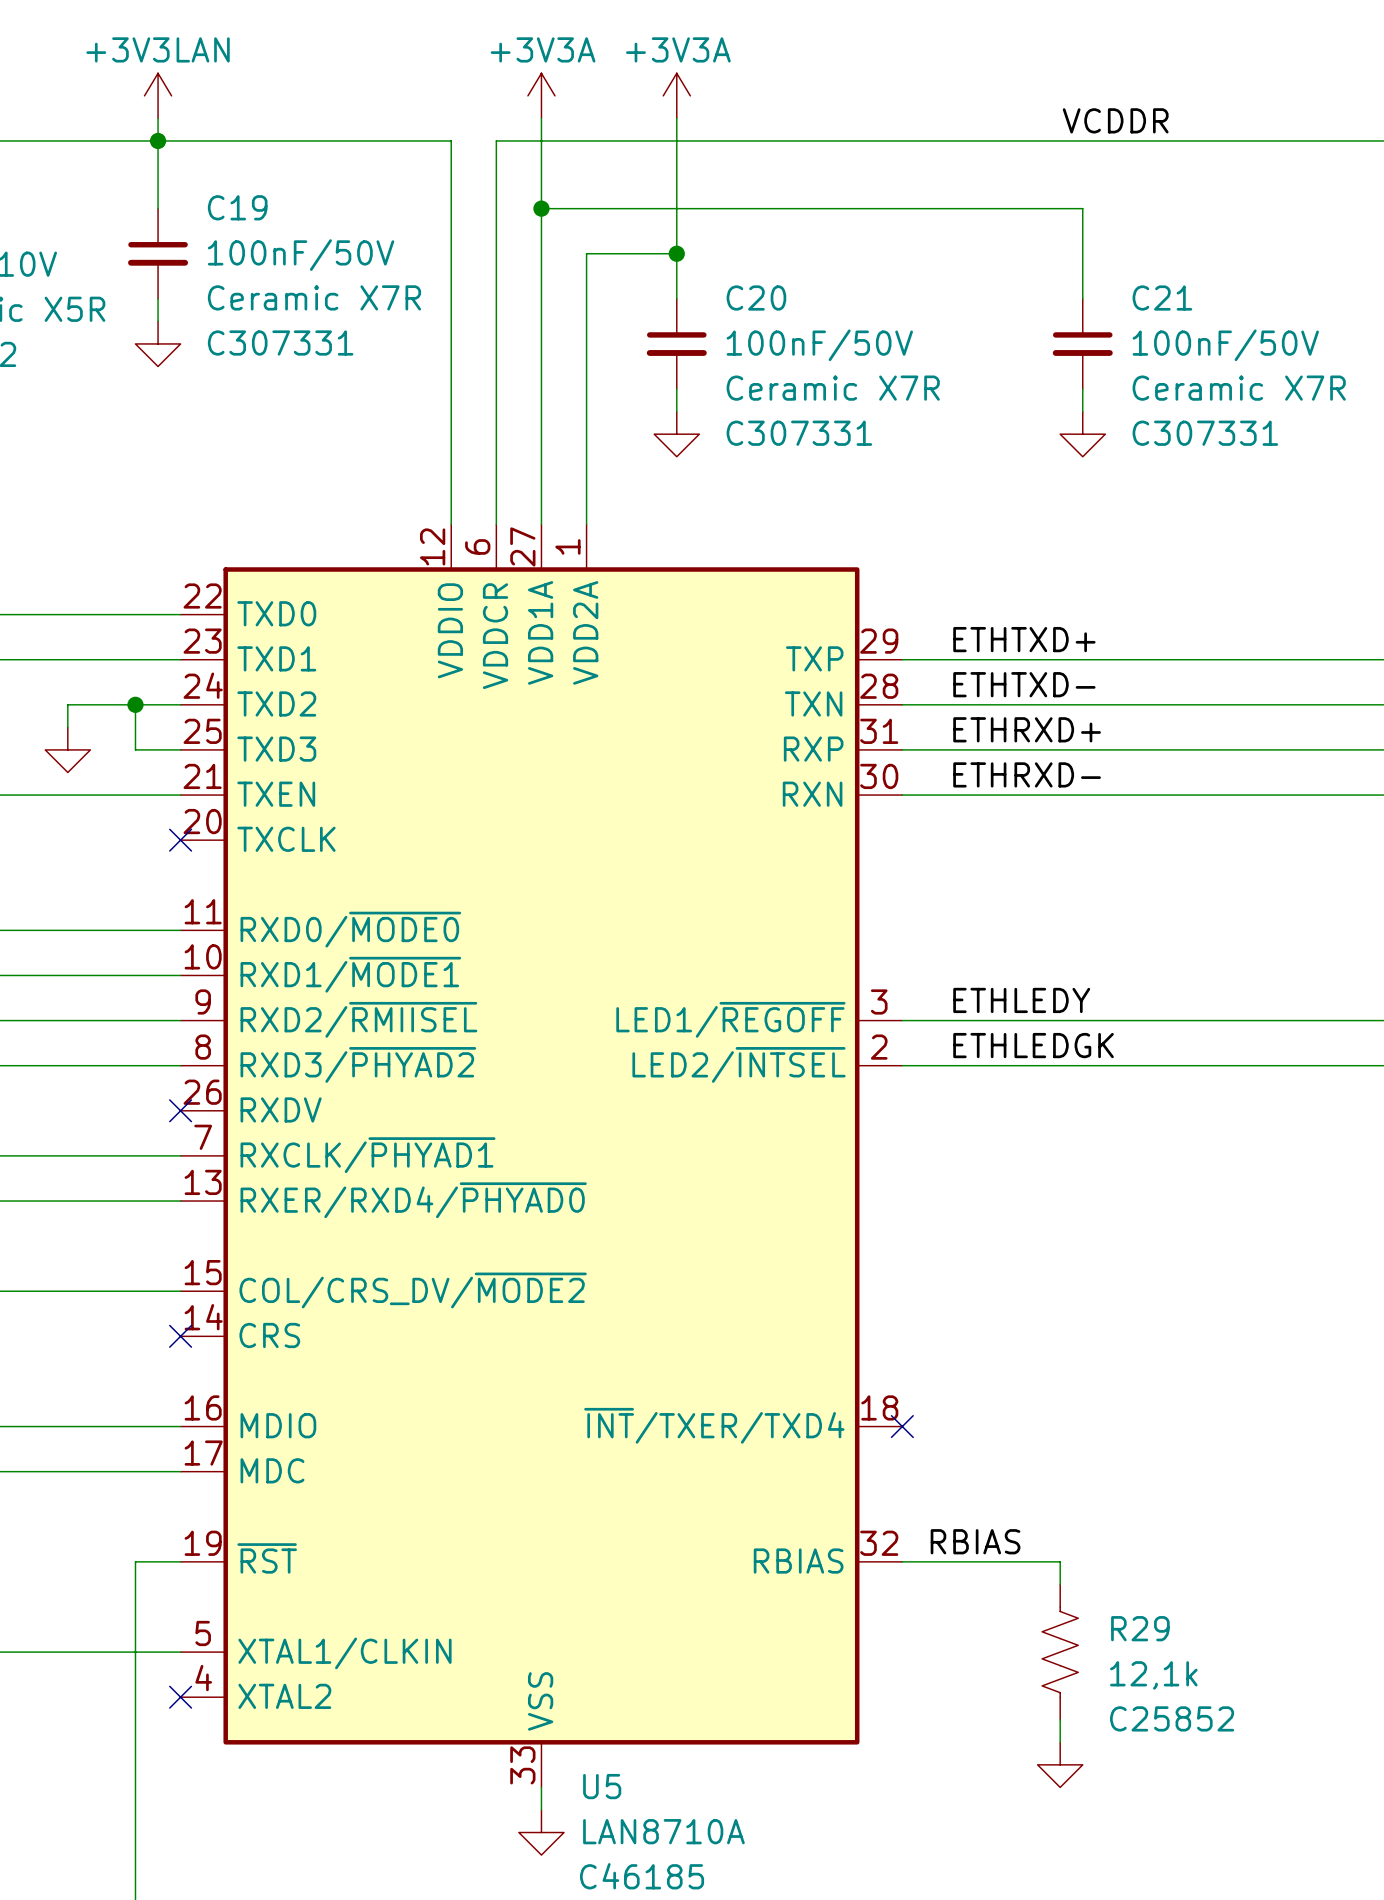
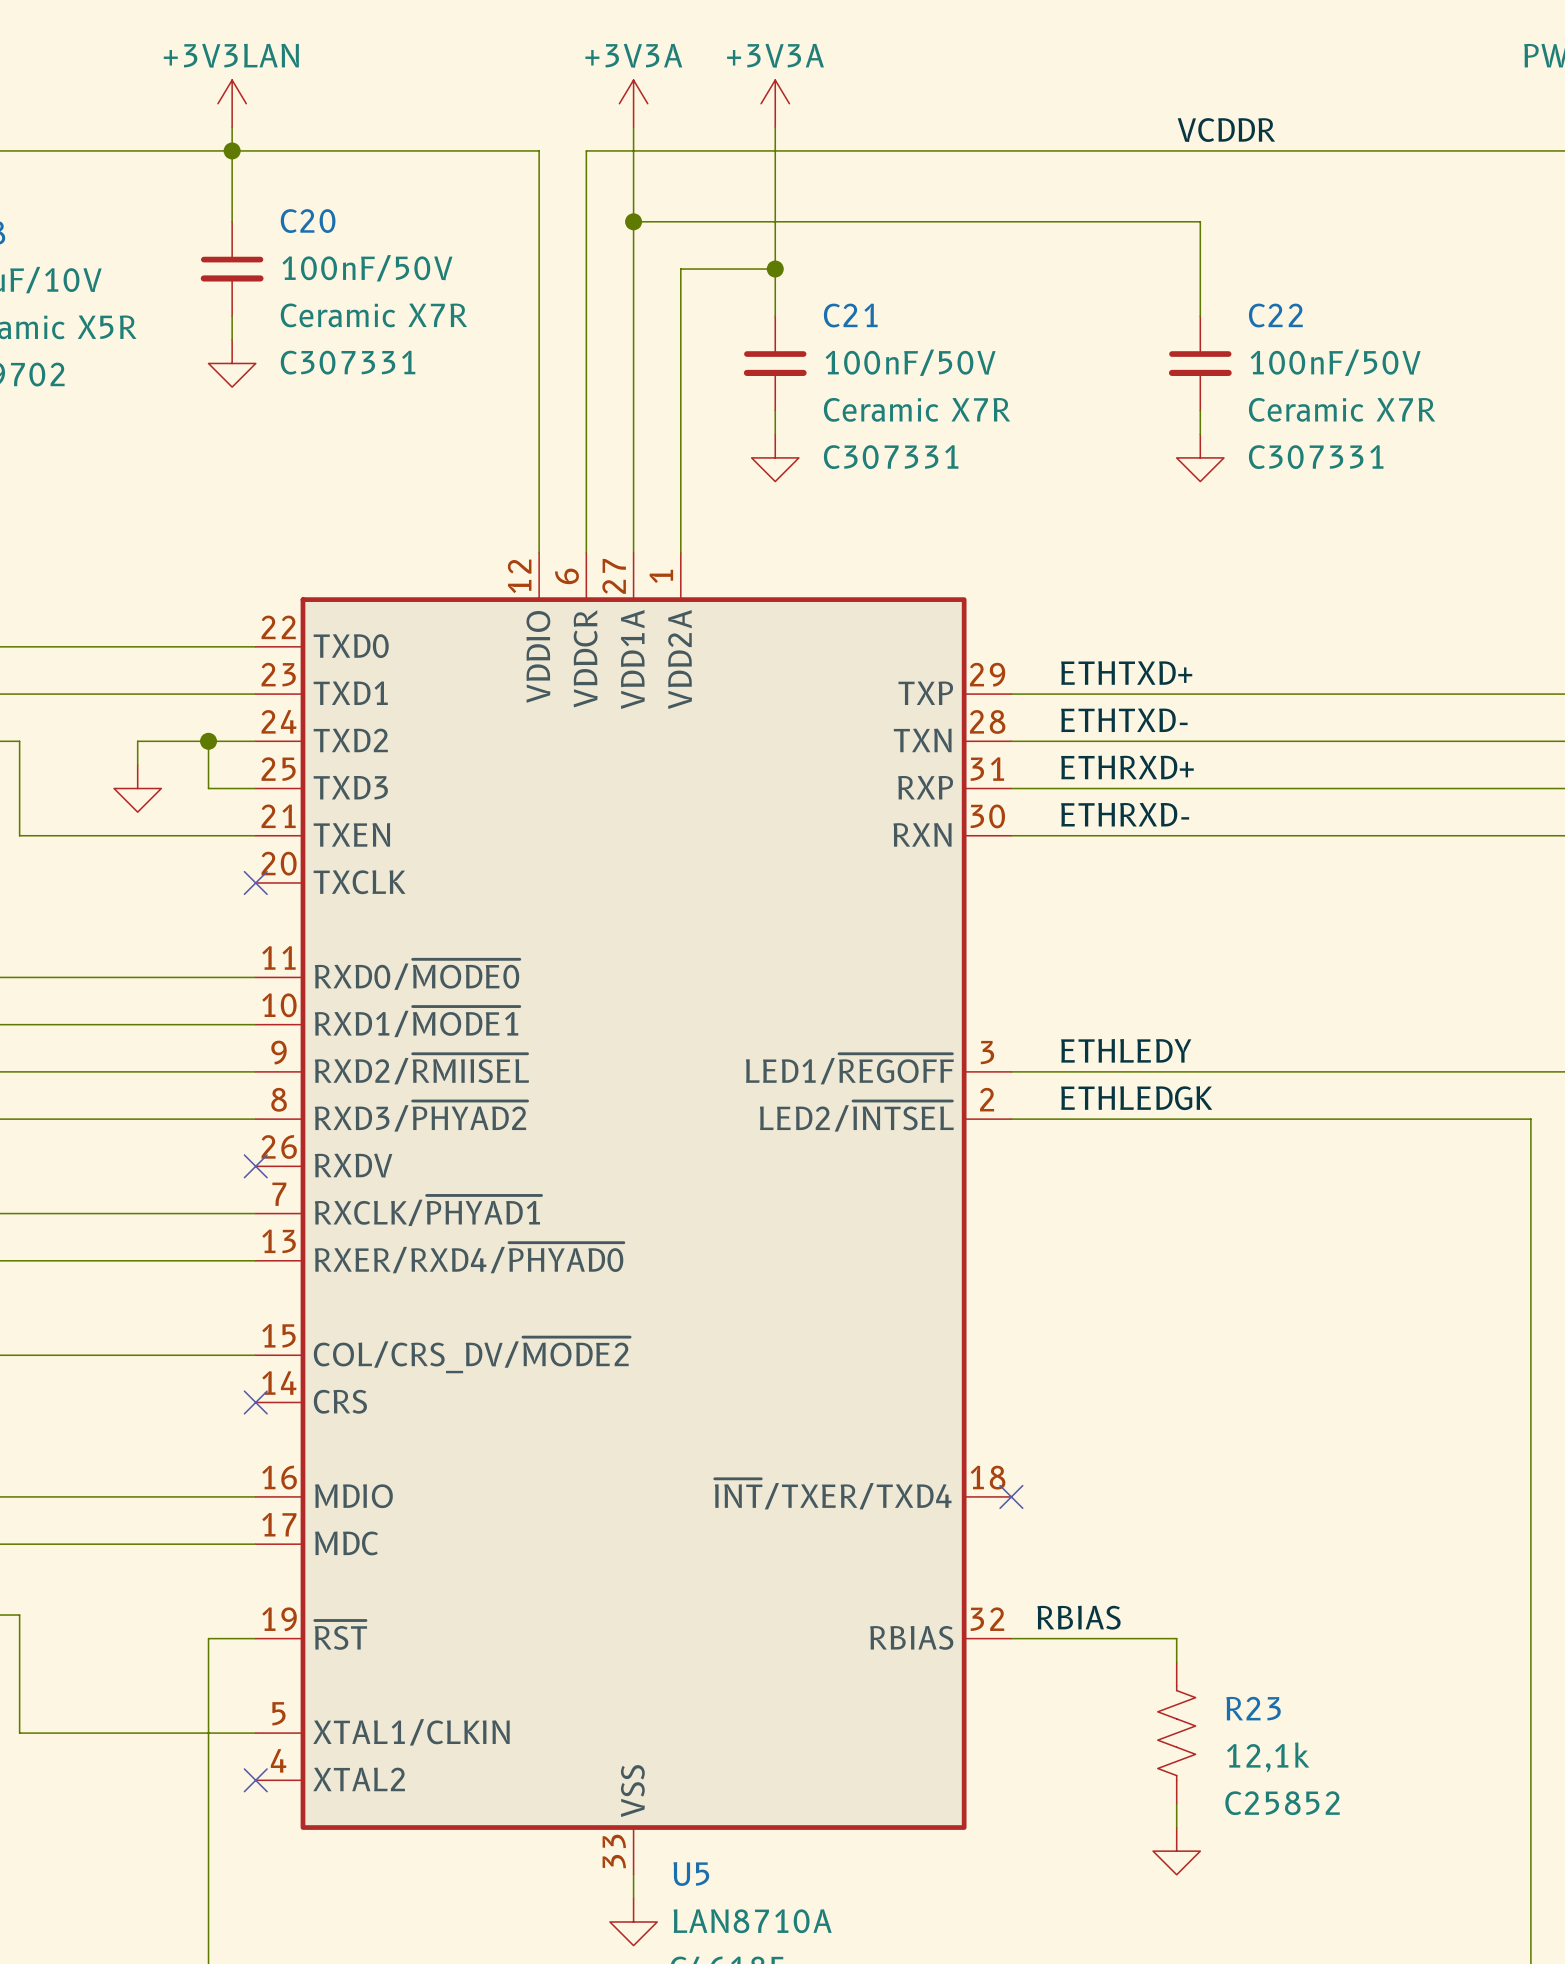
C19 name: C19 (237, 207) -> C20 (308, 221)
C20 name: C20 (756, 298) -> C21 (850, 315)
C21 name: C21 (1162, 298) -> C22 (1275, 315)
R29 name: R29 (1140, 1628) -> R23 (1253, 1708)

